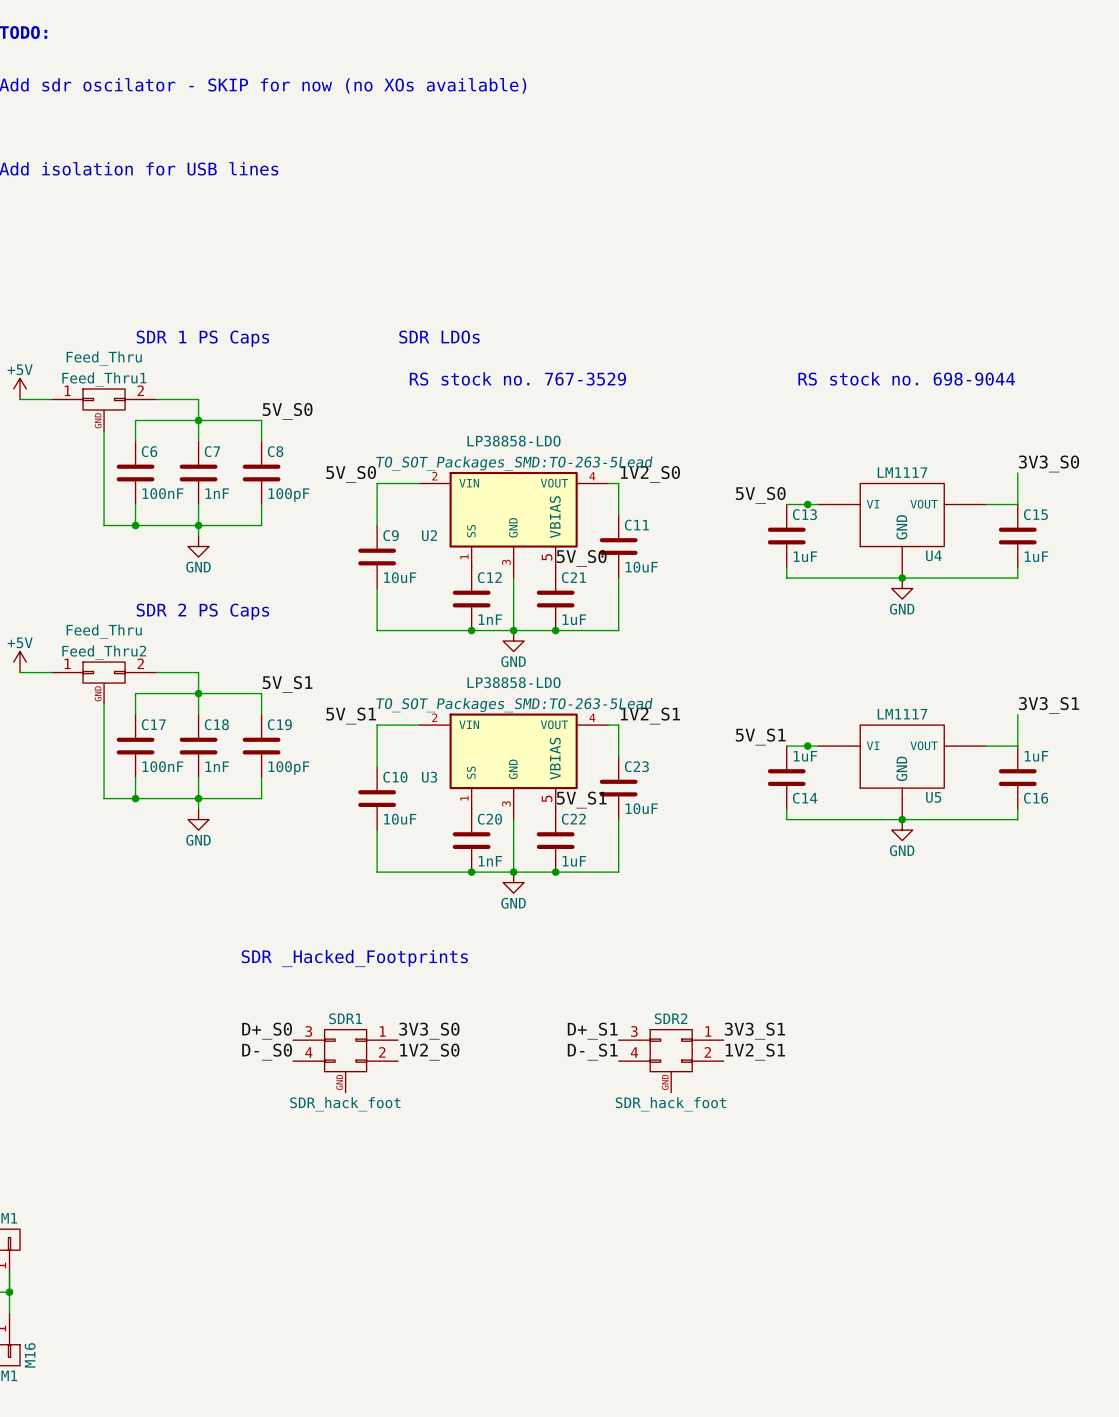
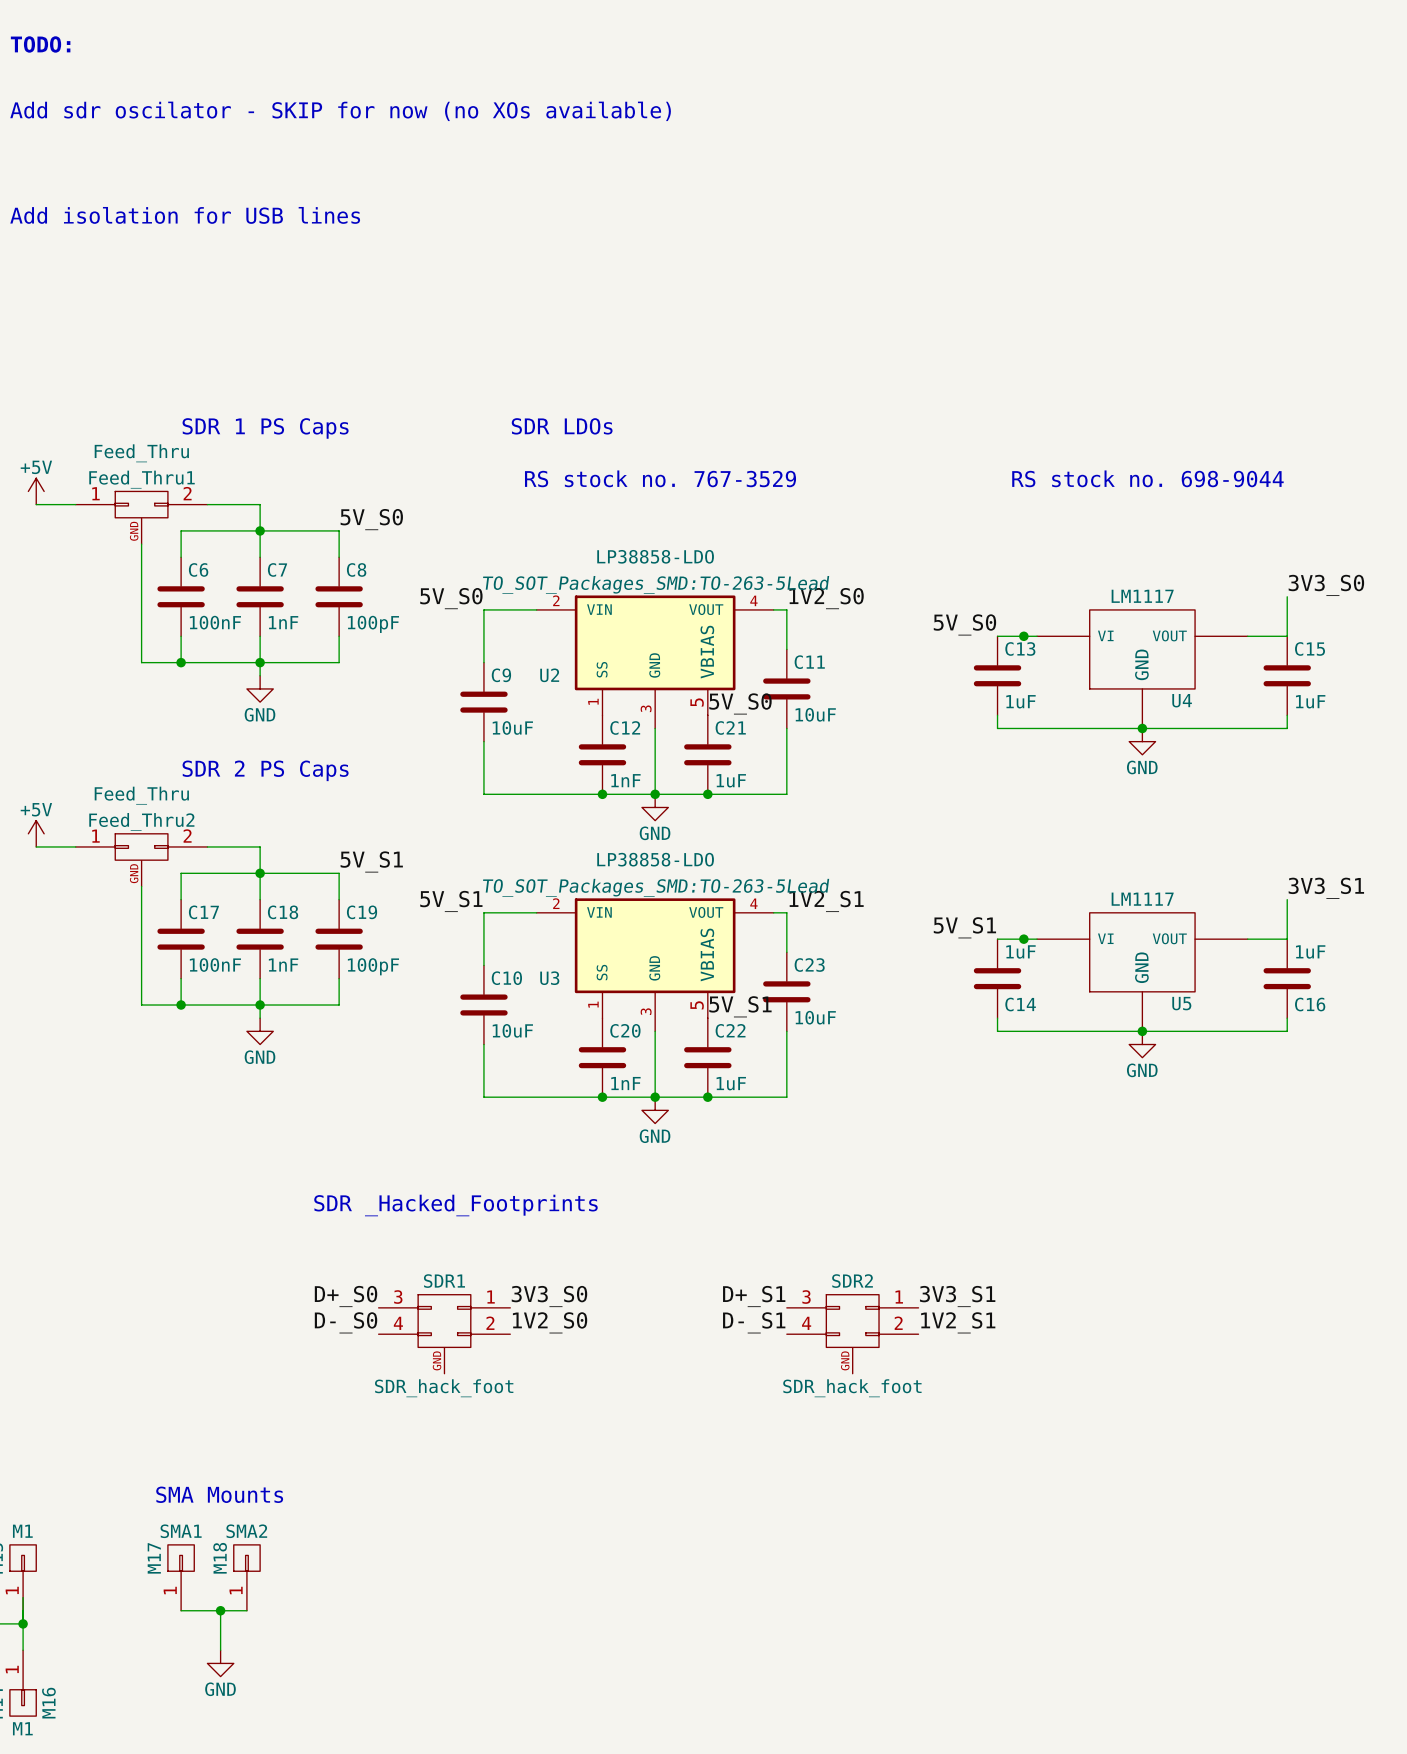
text: none -> SMA Mounts (219, 1494)
M17: none -> SMA1 (181, 1577)
M18: none -> SMA2 (246, 1577)
wire: none -> (181, 1610) (246, 1610)
wire: none -> (220, 1610) (220, 1650)
junction: none -> (220, 1610)
power symbol: none -> GND (220, 1663)

